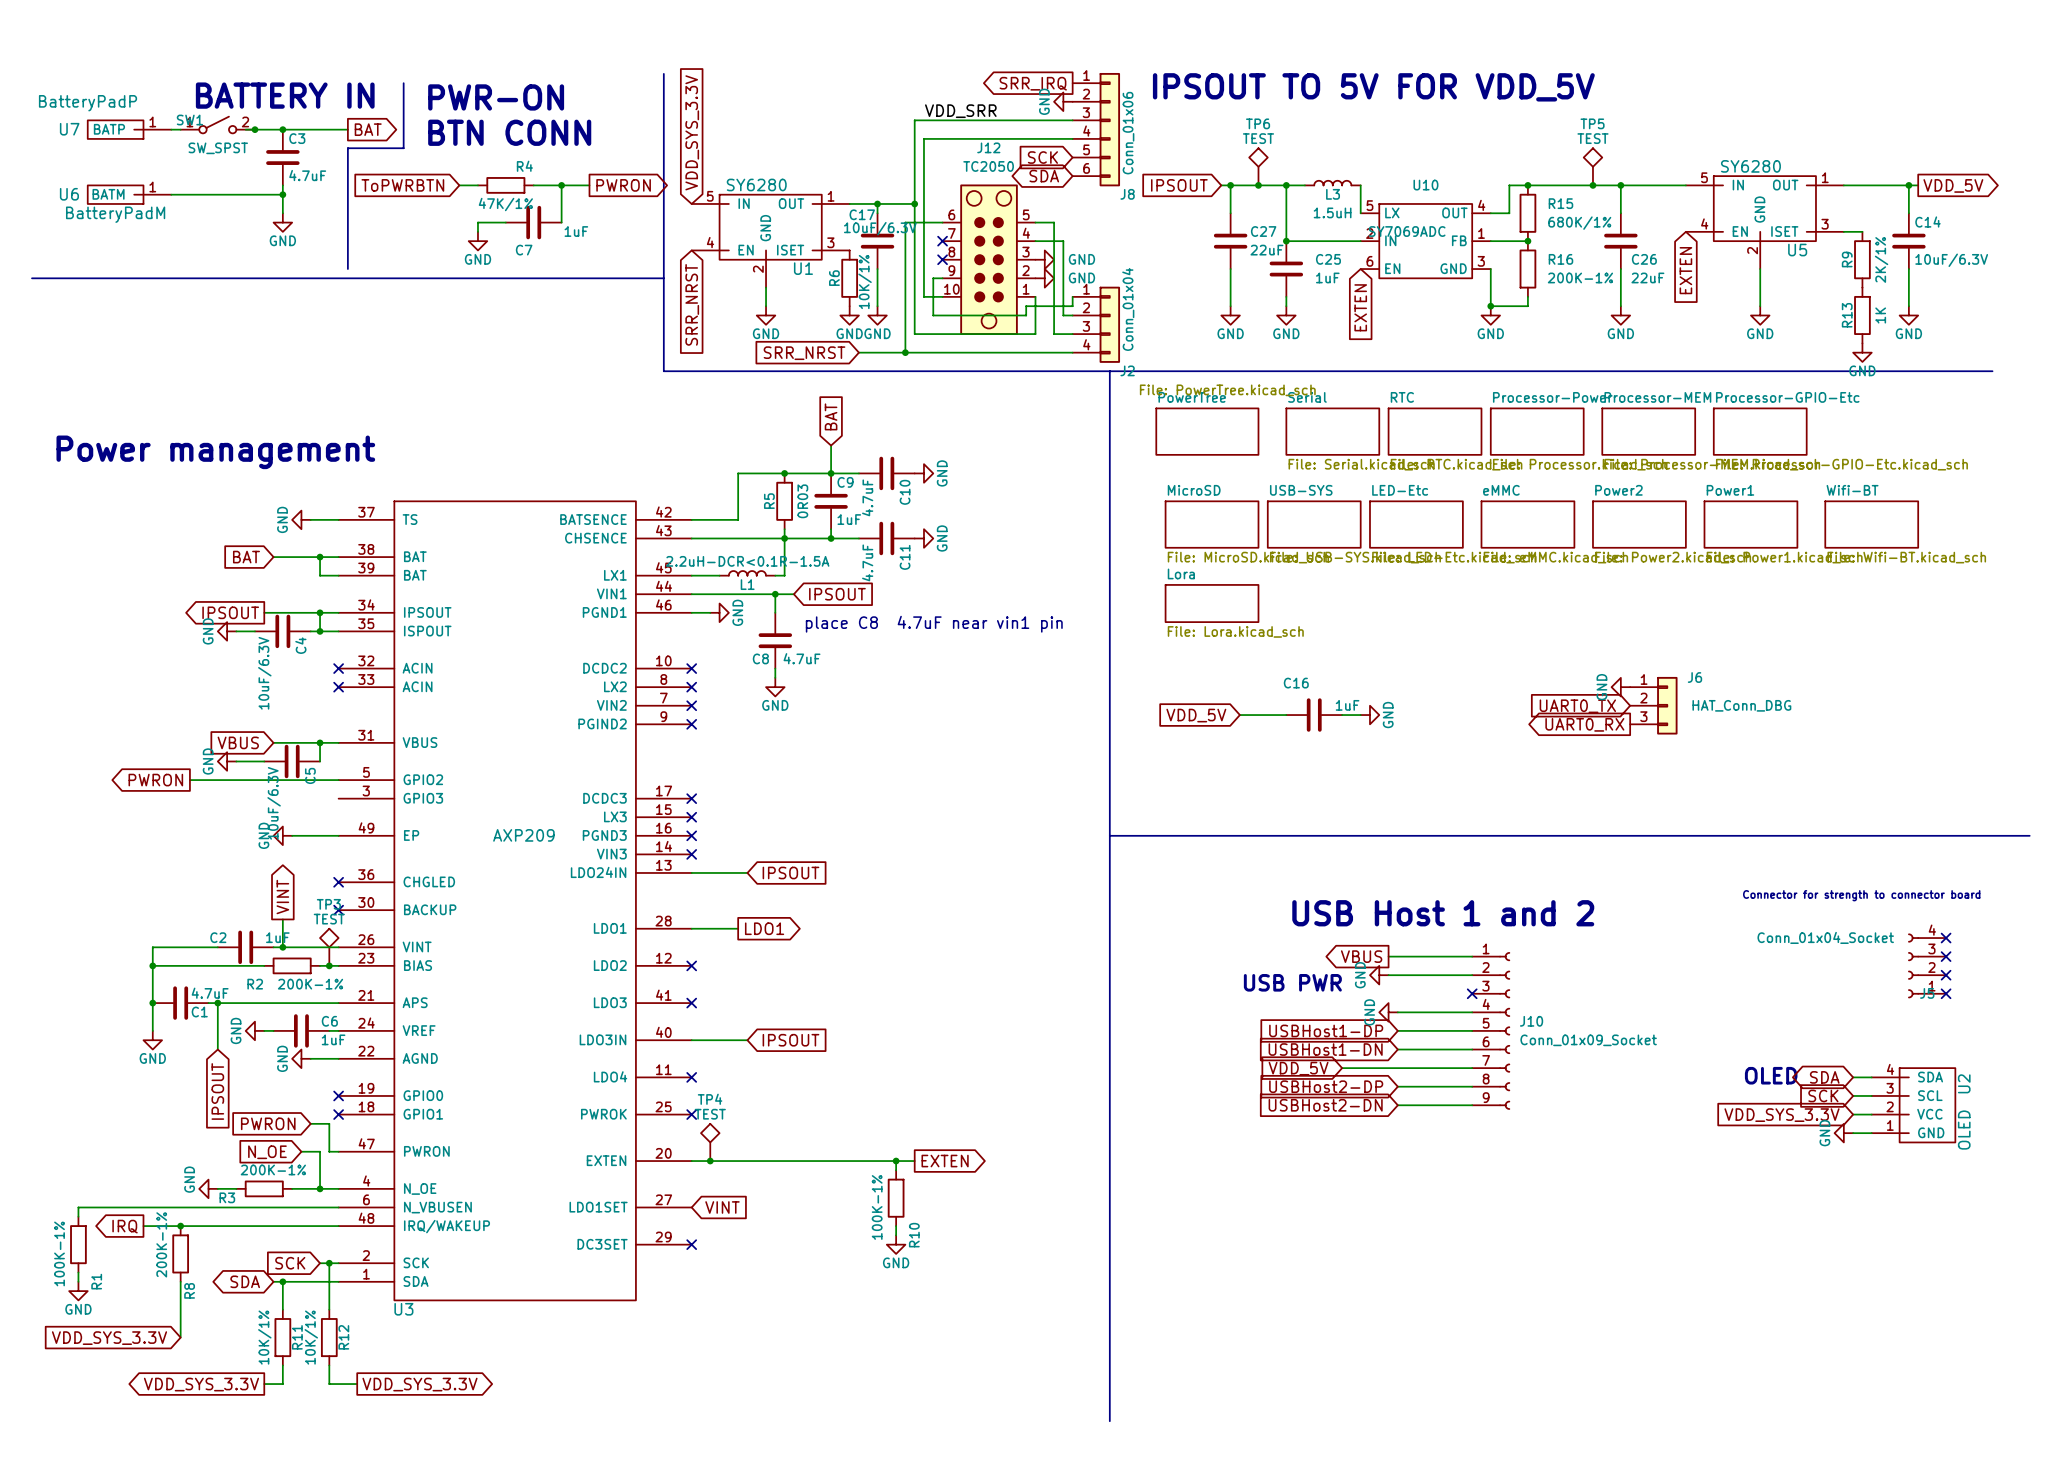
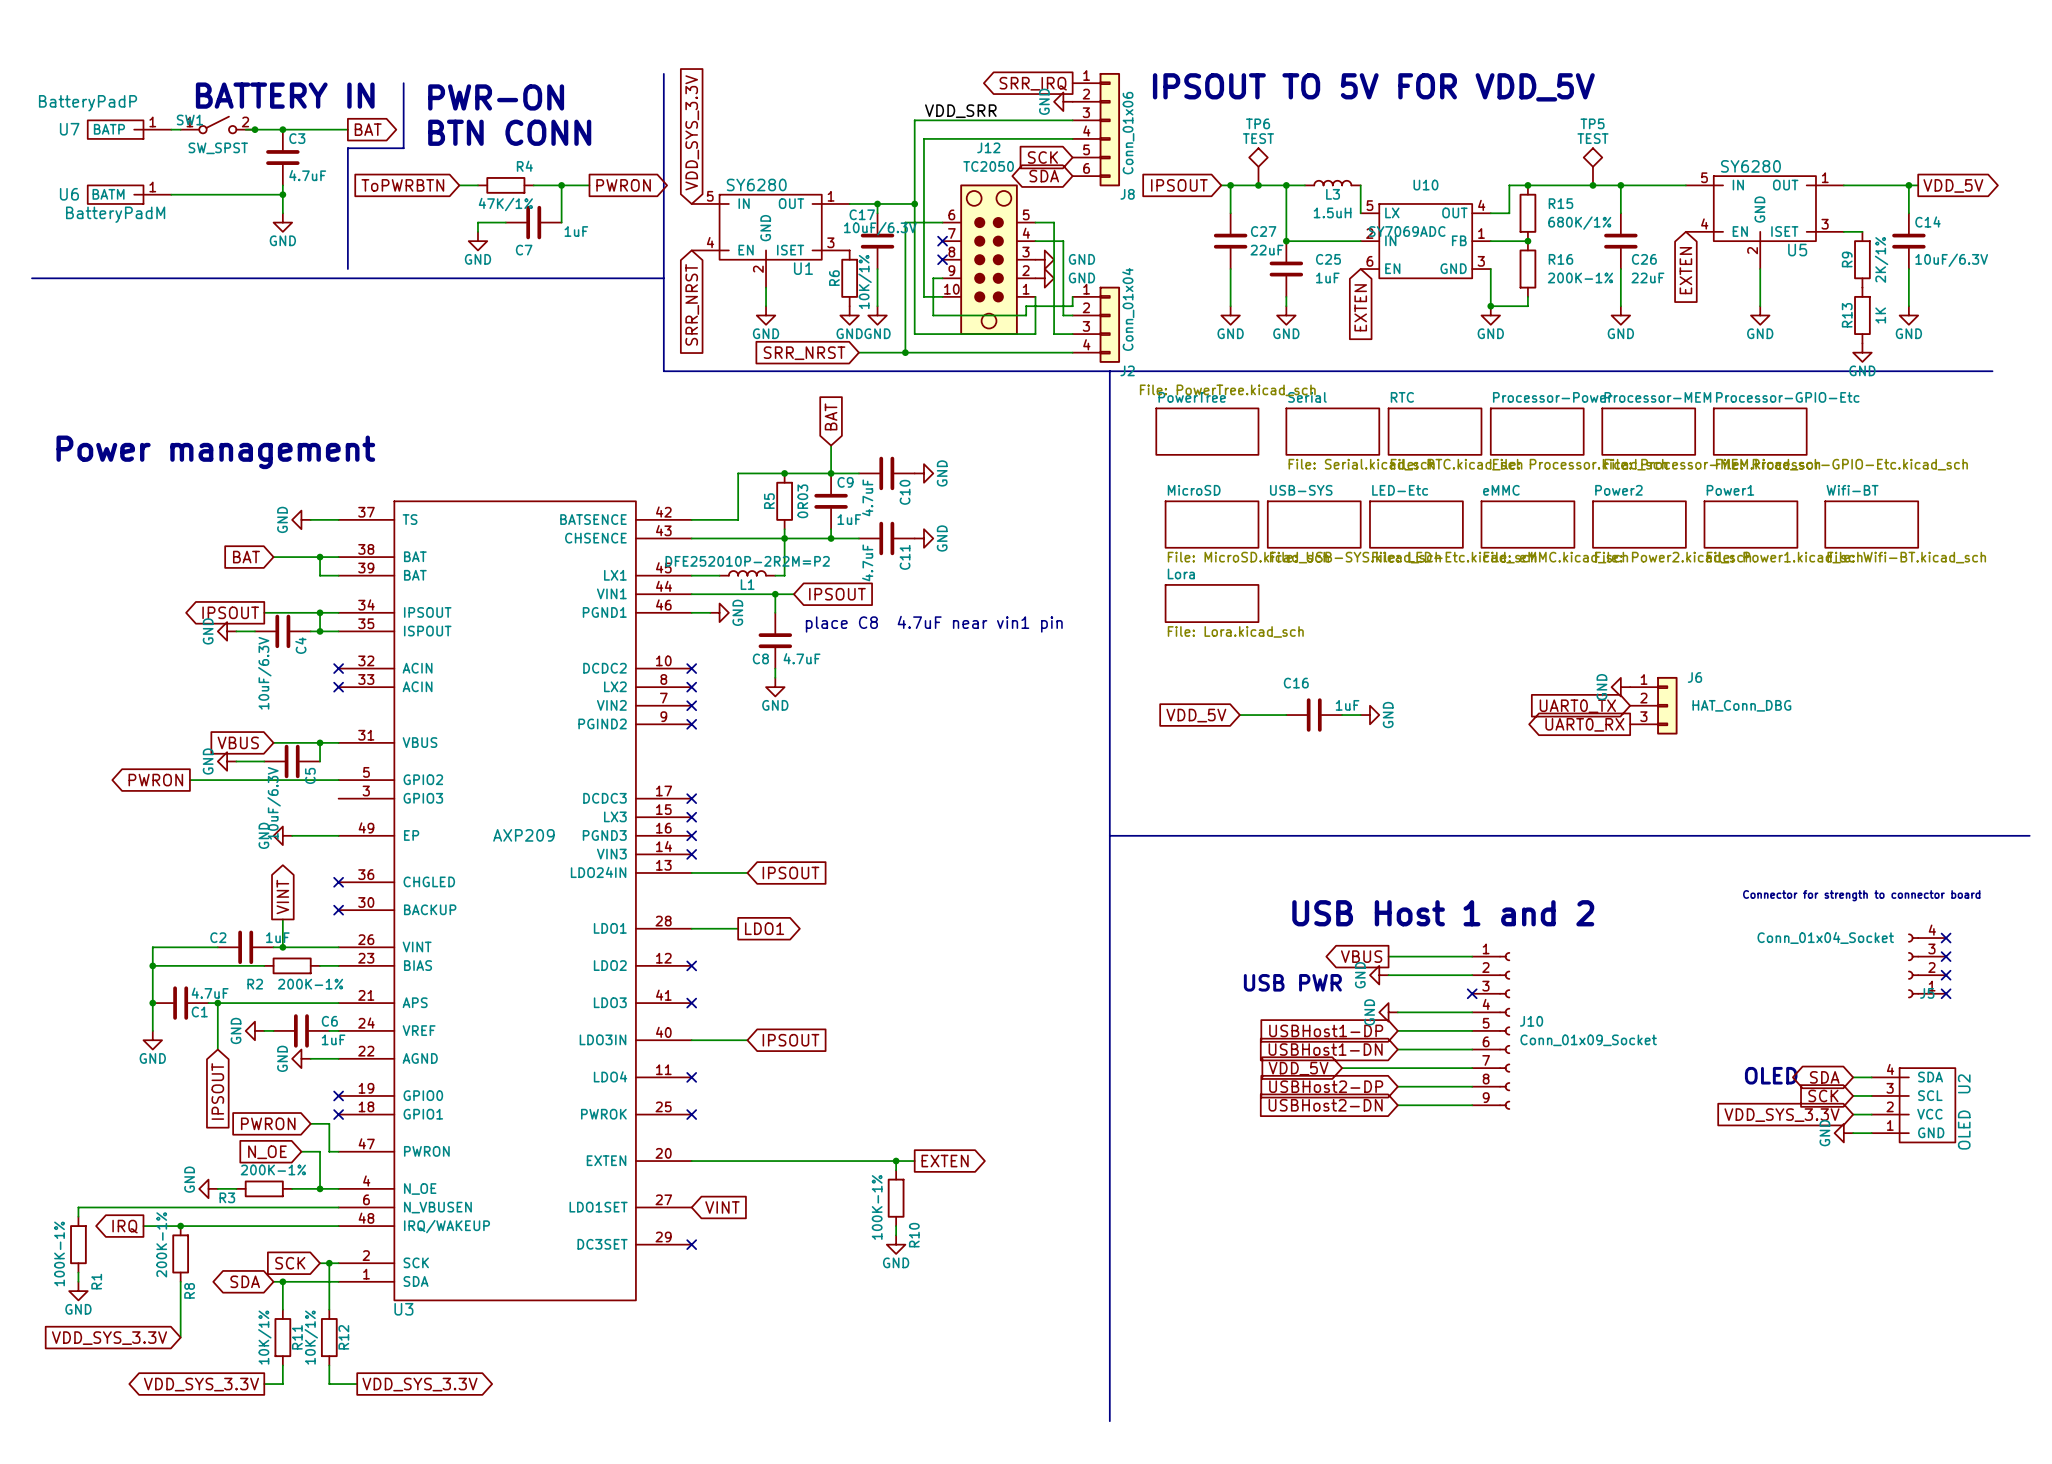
L1 value: 2.2uH-DCR<0.1R-1.5A (747, 561) -> DFE252010P-2R2M=P2 (747, 561)
TP3: TEST (329, 947) -> none
junction: (329, 965) -> none
TP4: TEST (710, 1142) -> none
junction: (710, 1161) -> none

